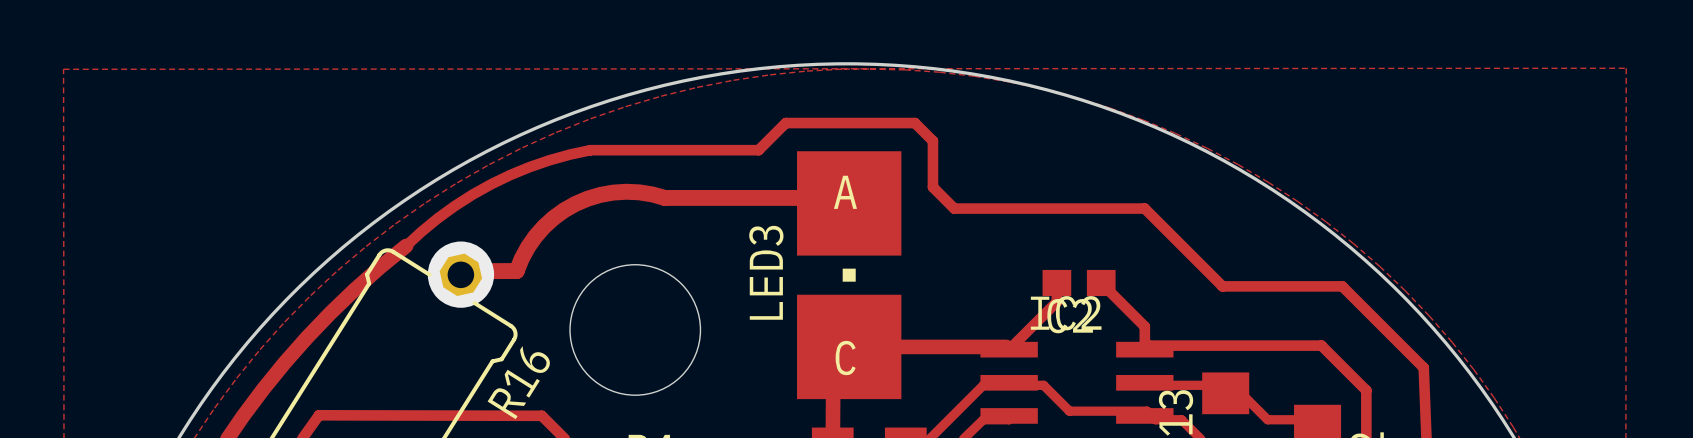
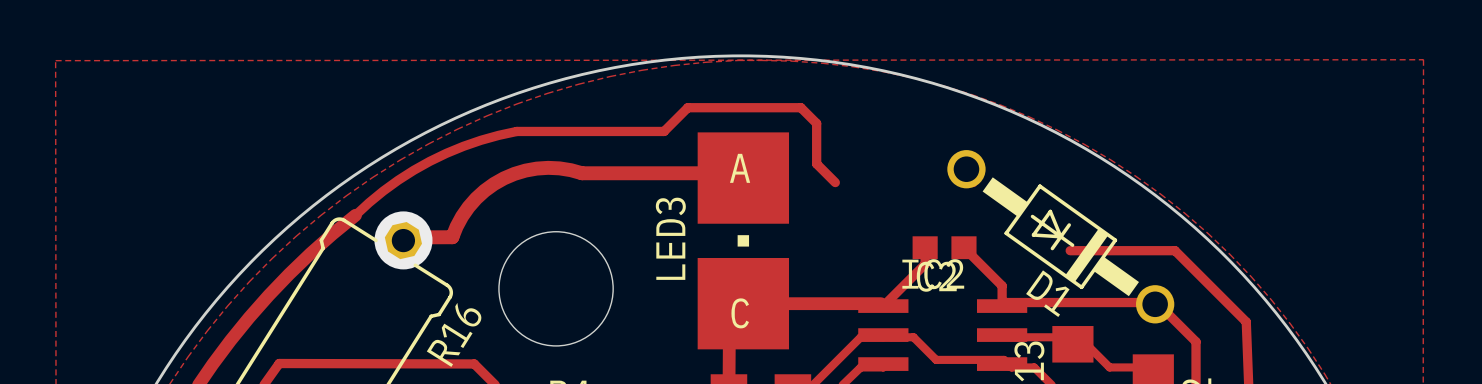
track: (954, 208) (1144, 208) (1222, 286) -> none
D1: none -> (1060, 236)

